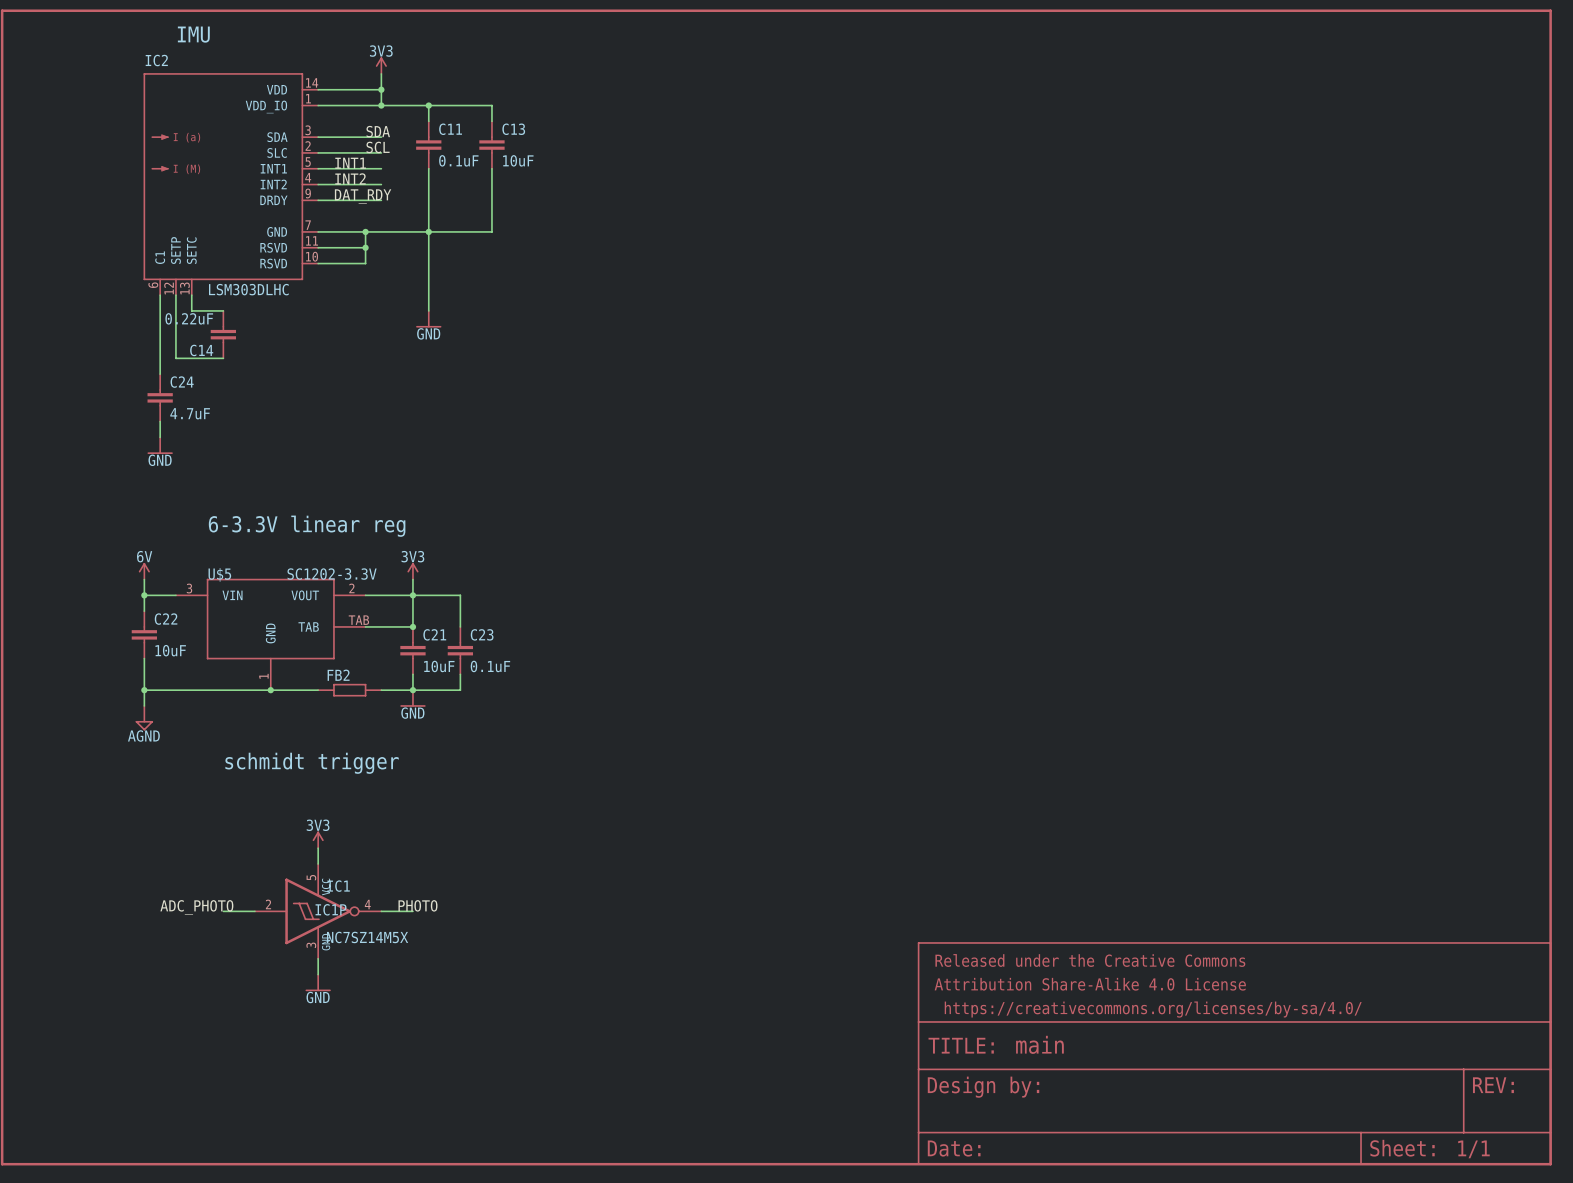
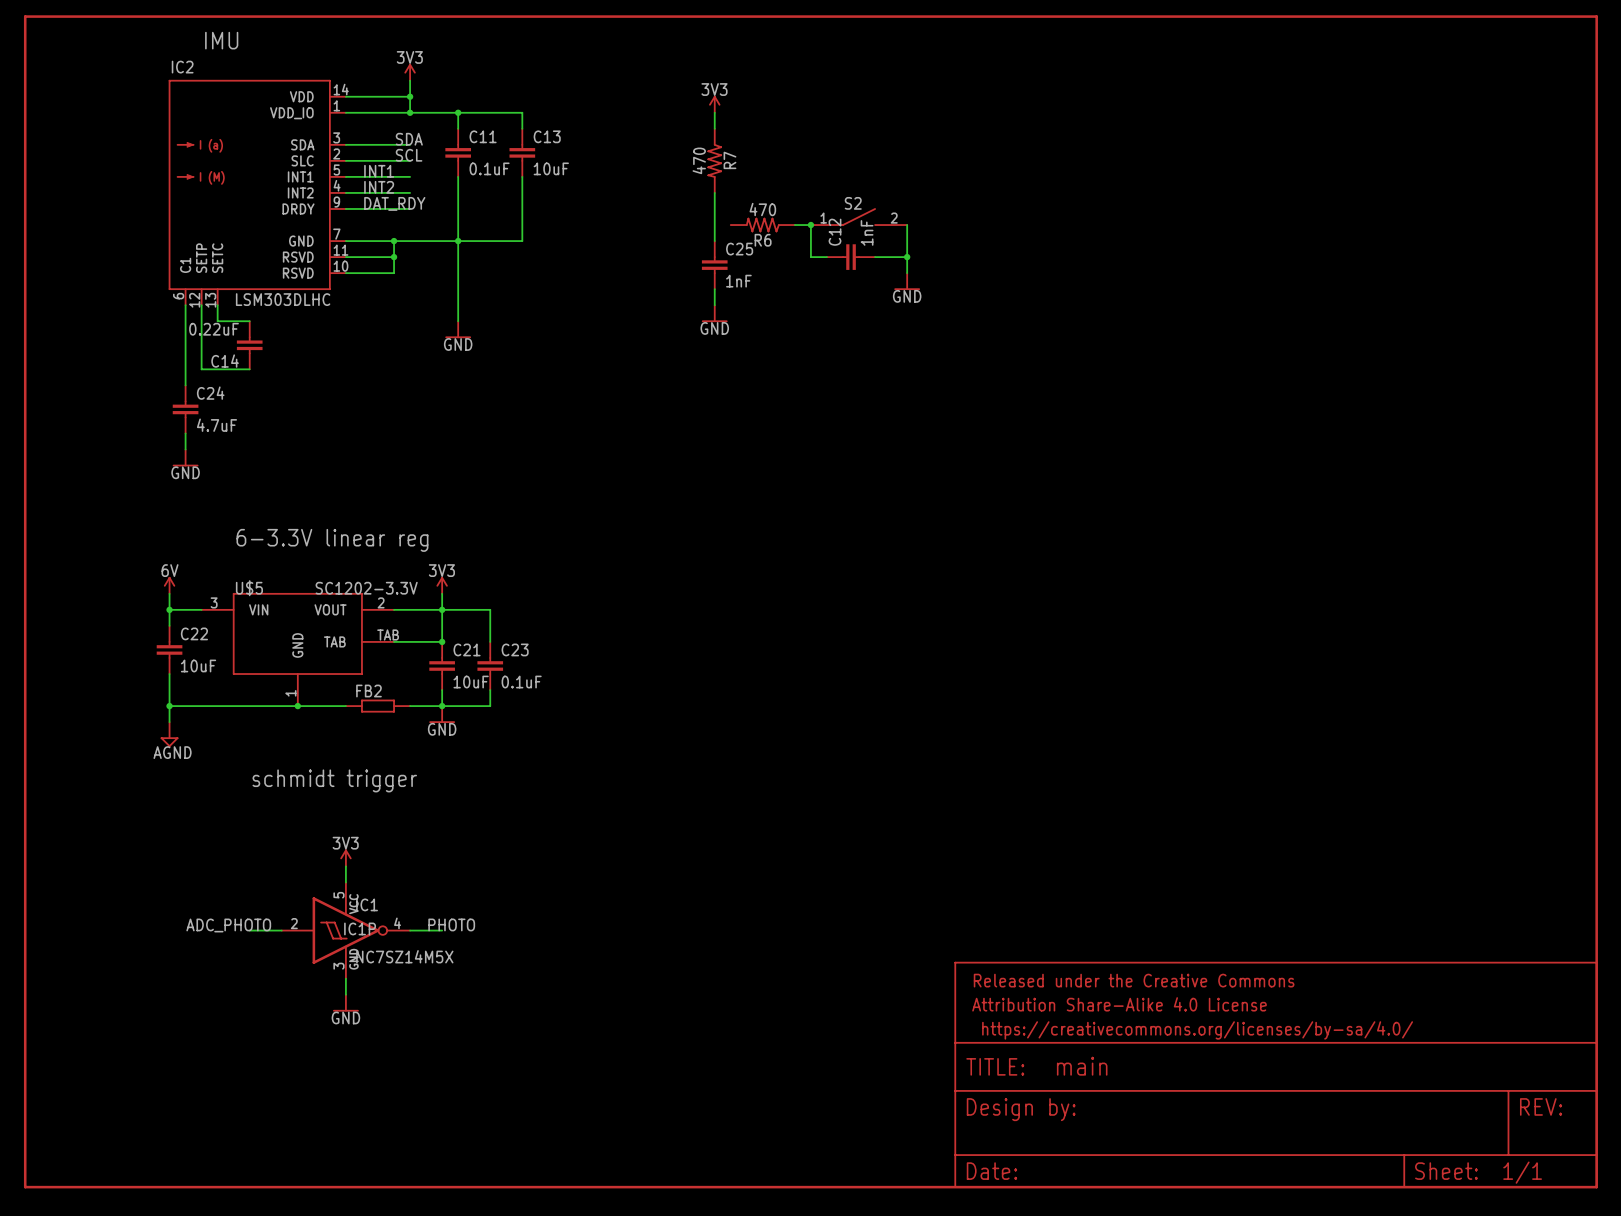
power symbol: none -> 3V3 (714, 104)
wire: none -> (714, 112) (714, 128)
R7: none -> 470 (714, 160)
wire: none -> (714, 192) (714, 241)
text: none -> S2 (853, 203)
part: none -> (859, 217)
R6: none -> 470 (762, 225)
wire: none -> (794, 225) (810, 225) (810, 257) (826, 257)
junction: none -> (810, 225)
wire: none -> (907, 225) (907, 273)
C12: none -> 1nF (851, 257)
wire: none -> (875, 257) (907, 257)
junction: none -> (907, 257)
C25: none -> 1nF (714, 265)
power symbol: none -> GND (907, 281)
wire: none -> (714, 289) (714, 305)
power symbol: none -> GND (714, 313)

